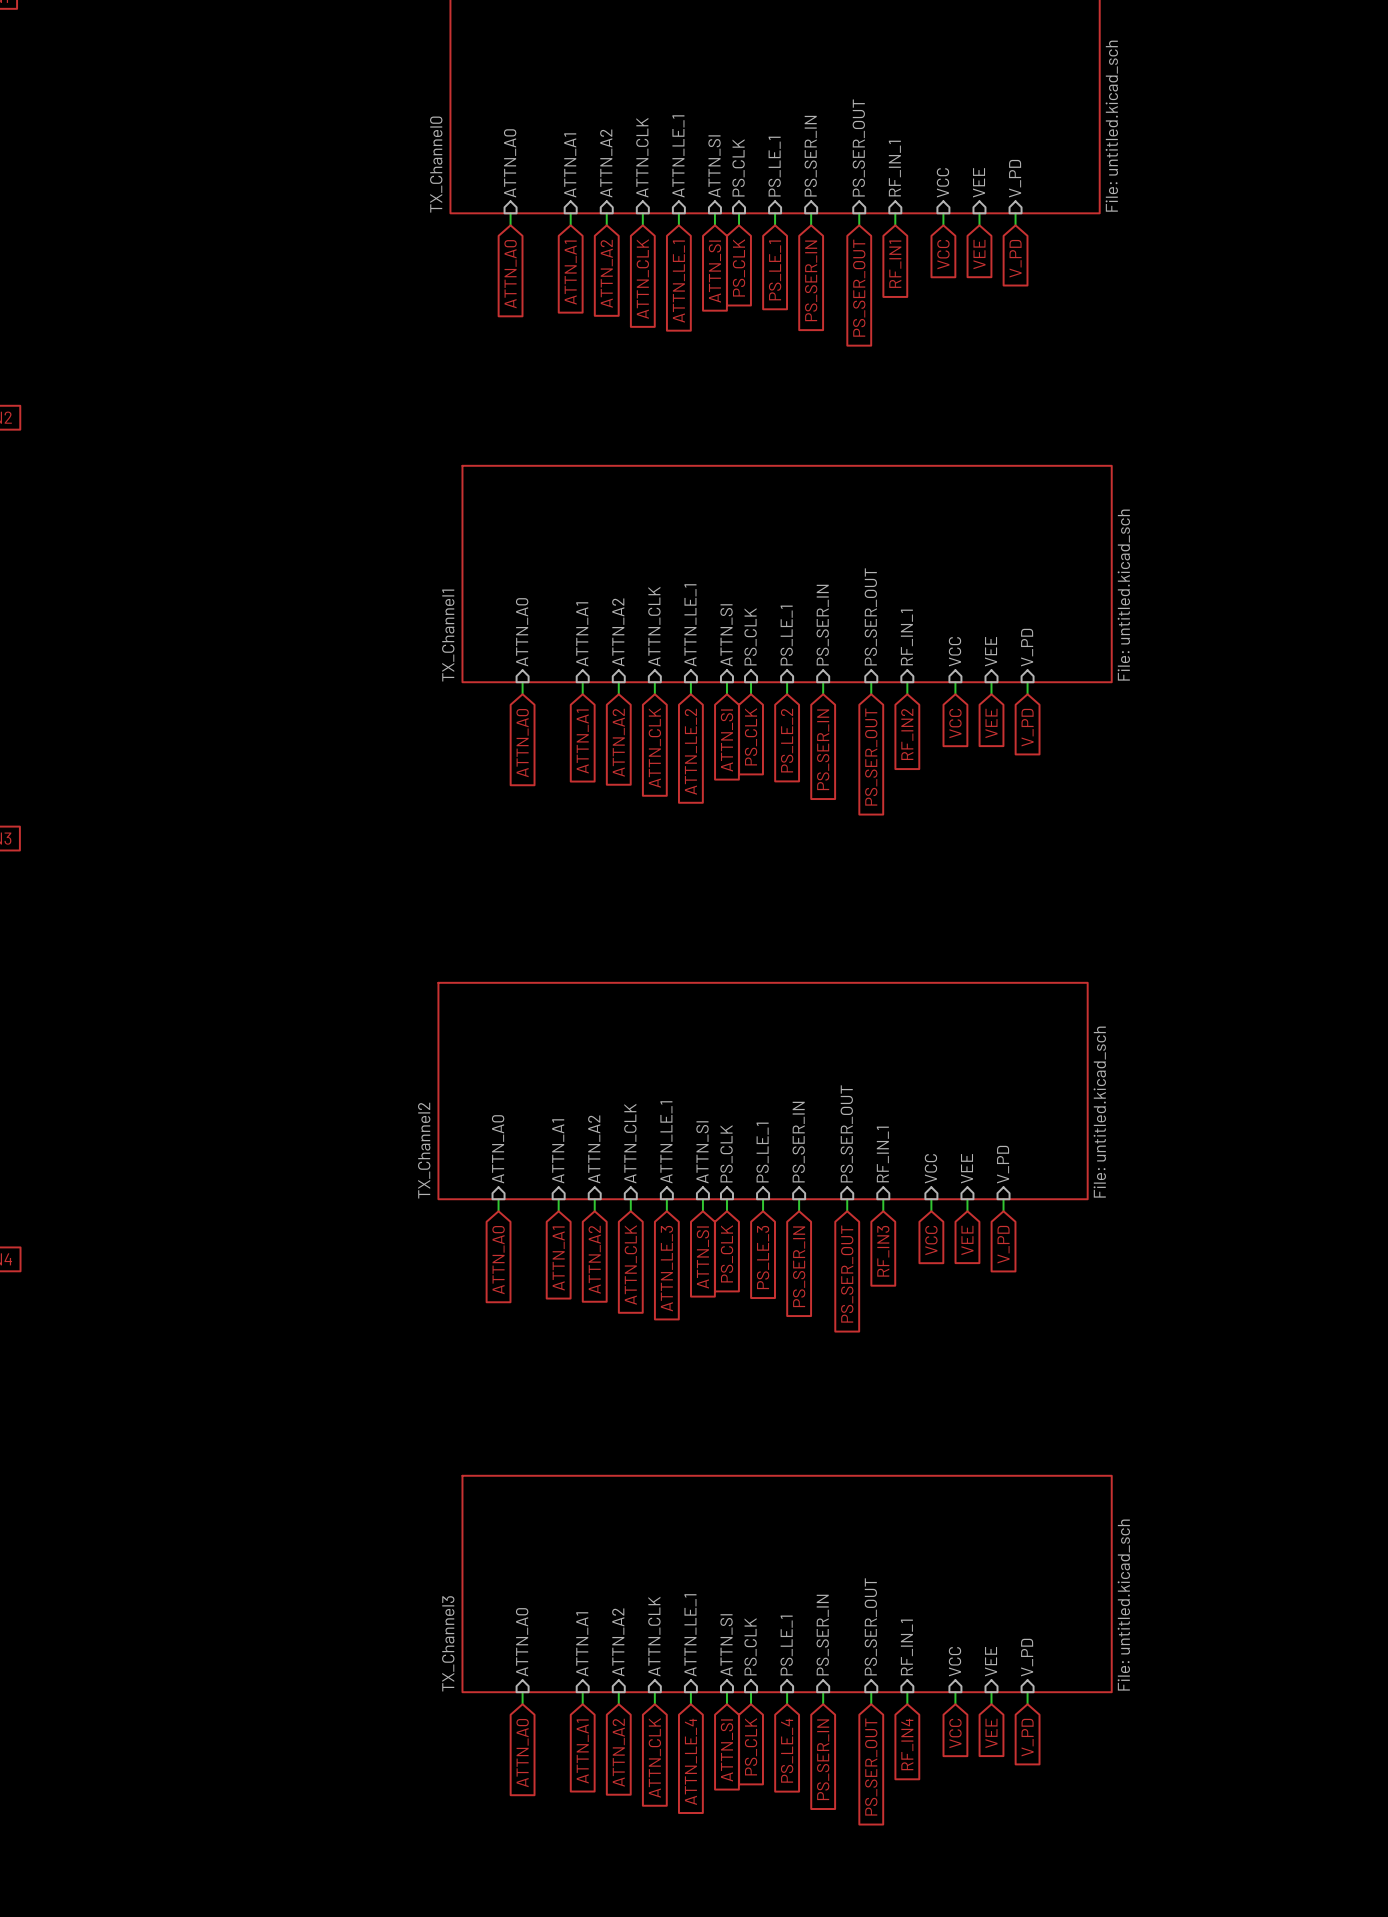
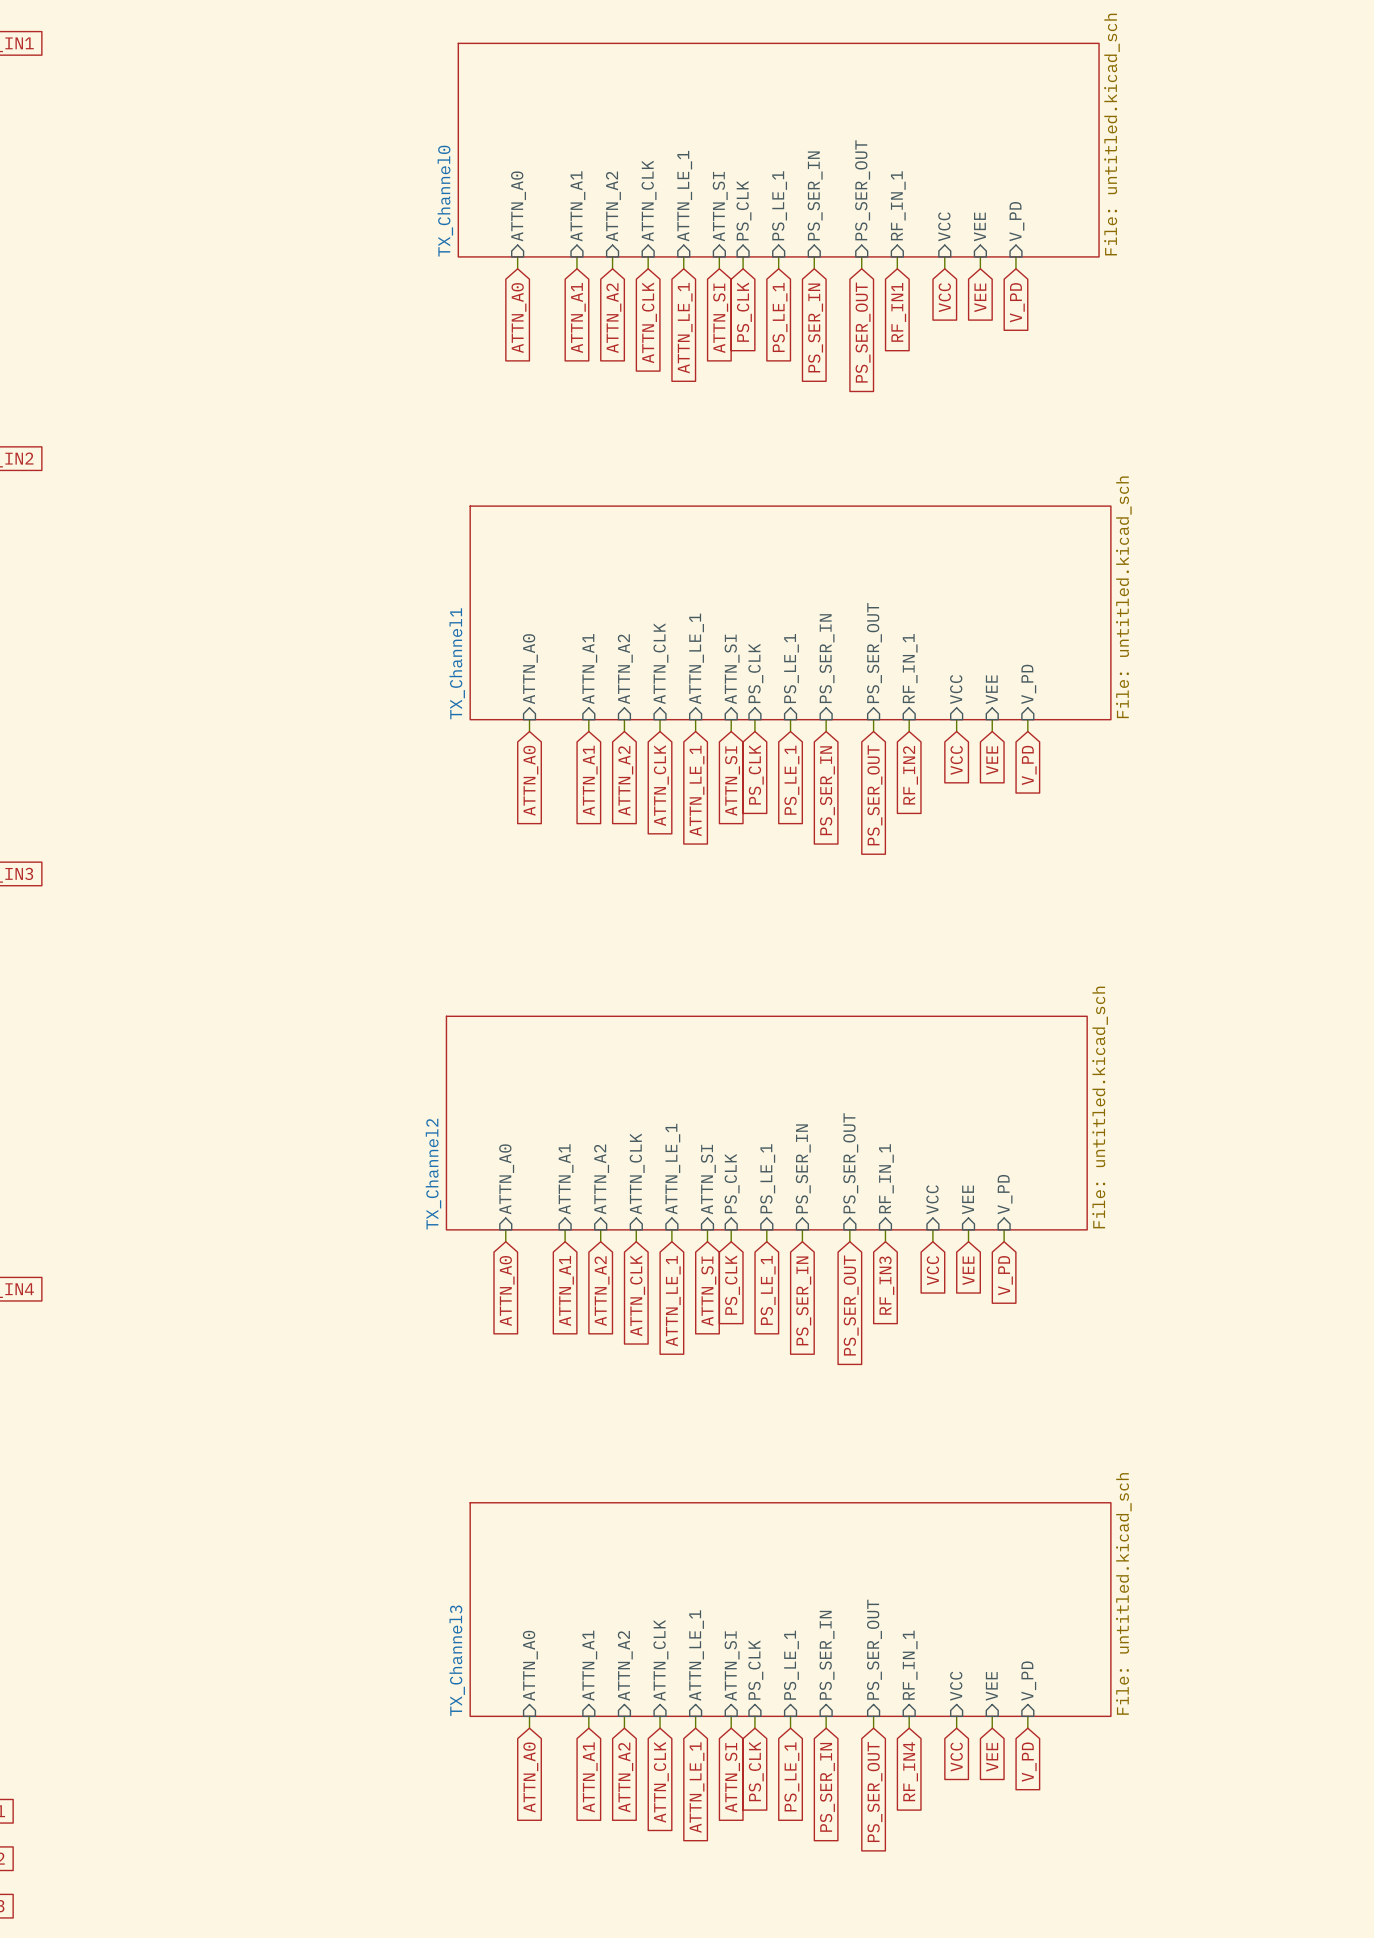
global label: PS_LE_2 (787, 740) -> PS_LE_1 (791, 780)
global label: ATTN_LE_2 (690, 751) -> ATTN_LE_1 (697, 790)
global label: PS_LE_3 (763, 1257) -> PS_LE_1 (768, 1290)
global label: ATTN_LE_3 (666, 1268) -> ATTN_LE_1 (673, 1301)
global label: PS_LE_4 (787, 1750) -> PS_LE_1 (791, 1776)
global label: ATTN_LE_4 (690, 1761) -> ATTN_LE_1 (697, 1787)

